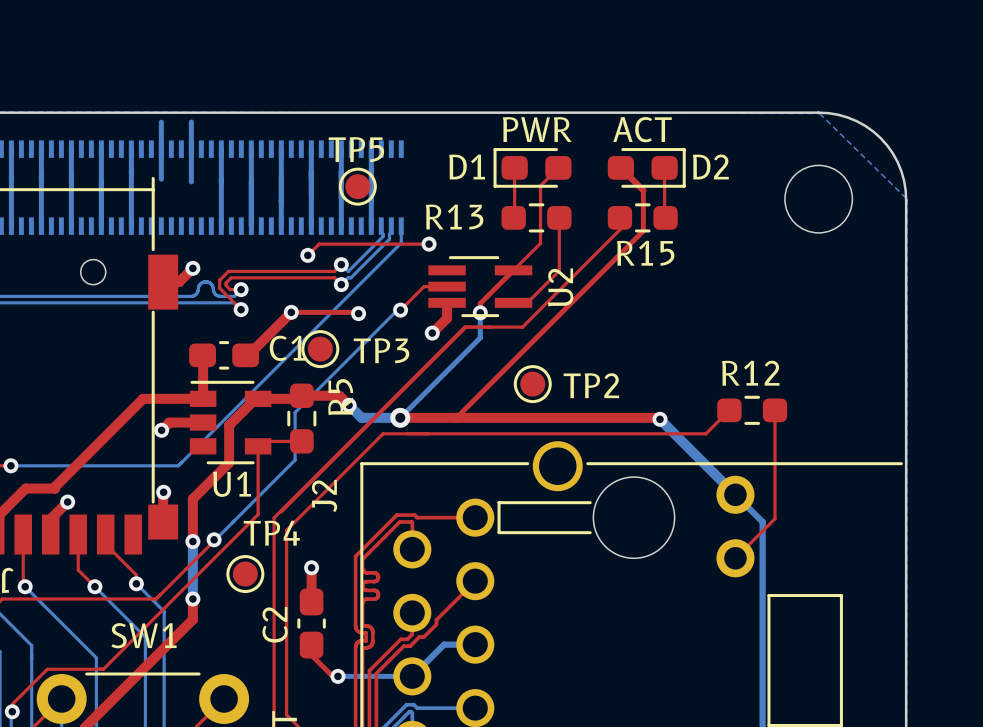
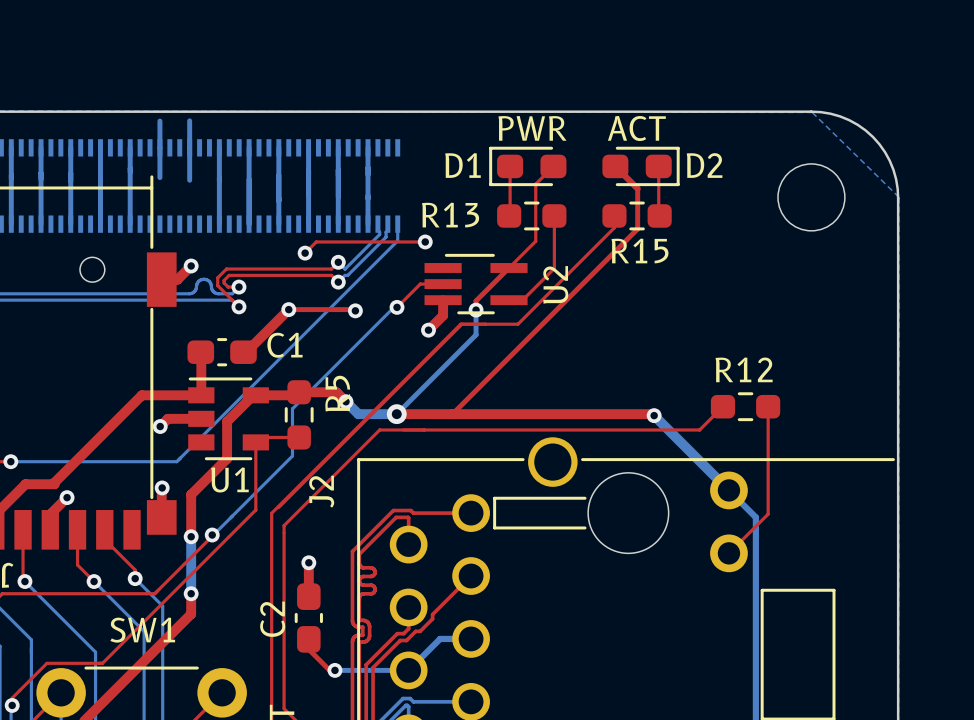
TP5: (357, 186) -> none
TP3: (320, 349) -> none
TP2: (532, 384) -> none
TP4: (245, 574) -> none

